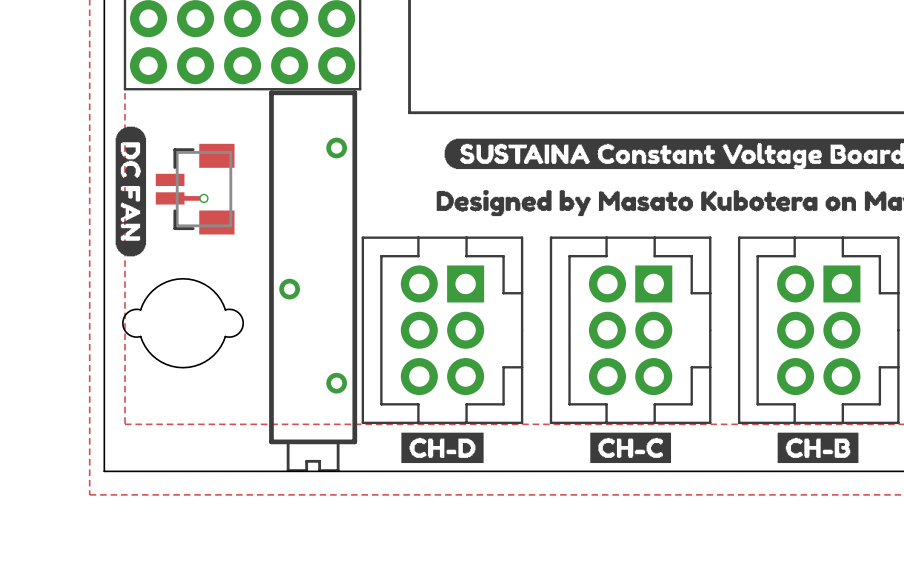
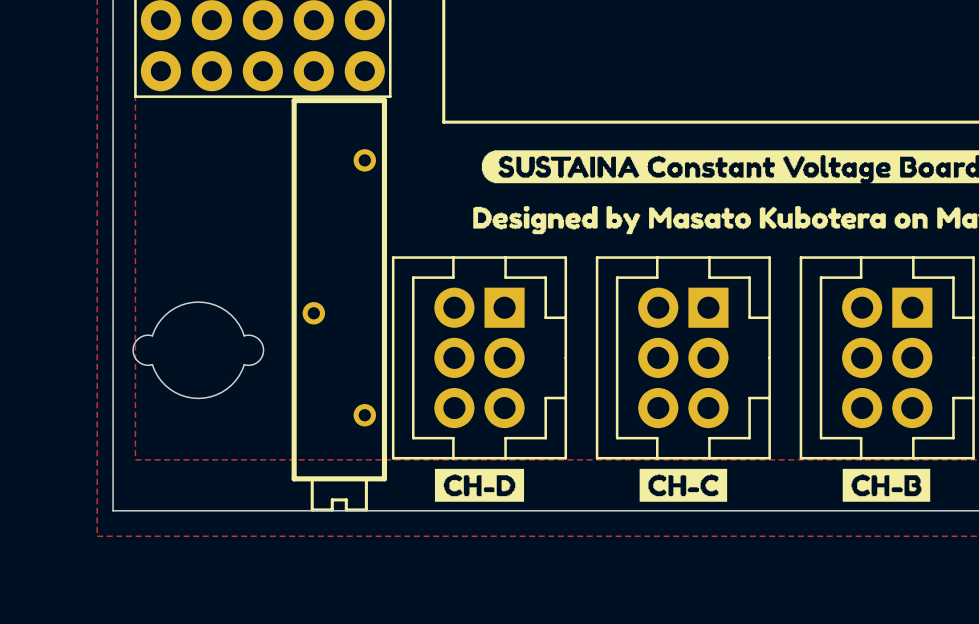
drawing: [115, 126, 147, 257] -> none
part: (195, 189) -> none
track: (170, 198) (203, 198) -> none
via: (203, 198) -> none

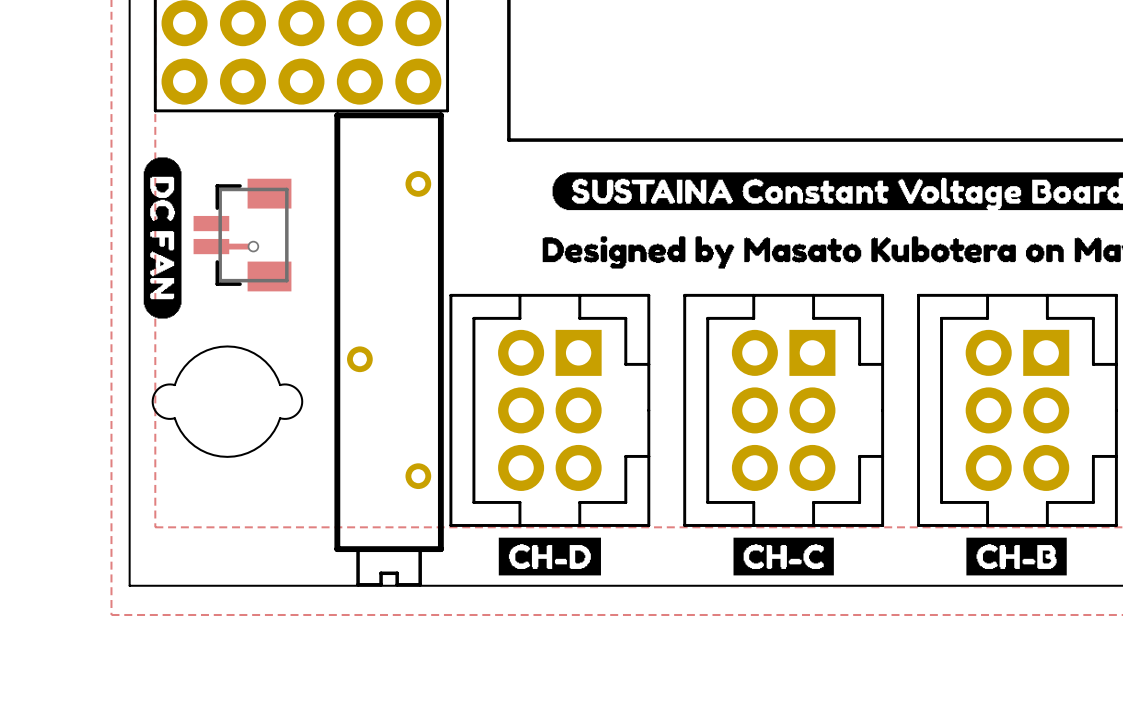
drawing: none -> [143, 157, 182, 319]
part: none -> (242, 235)
track: none -> (211, 246) (253, 246)
via: none -> (253, 246)

